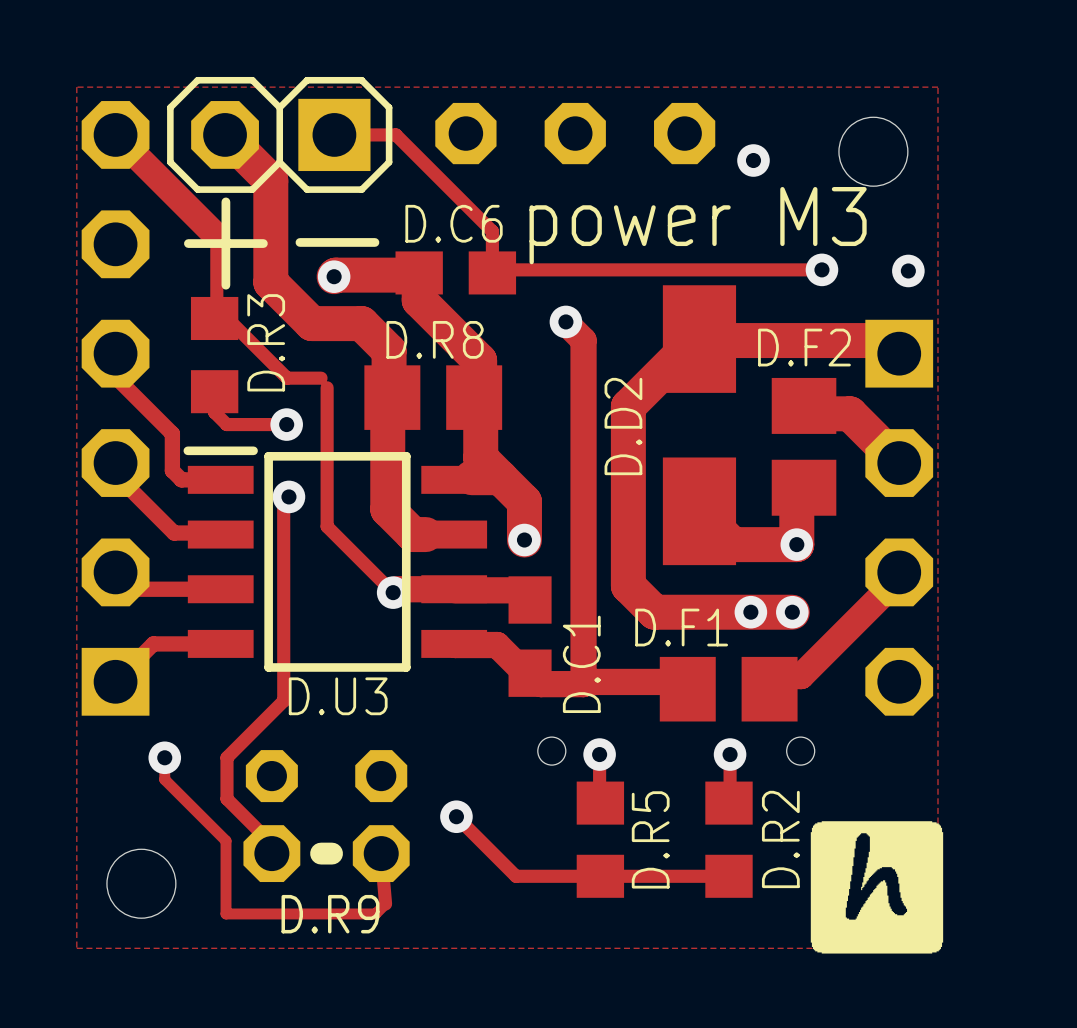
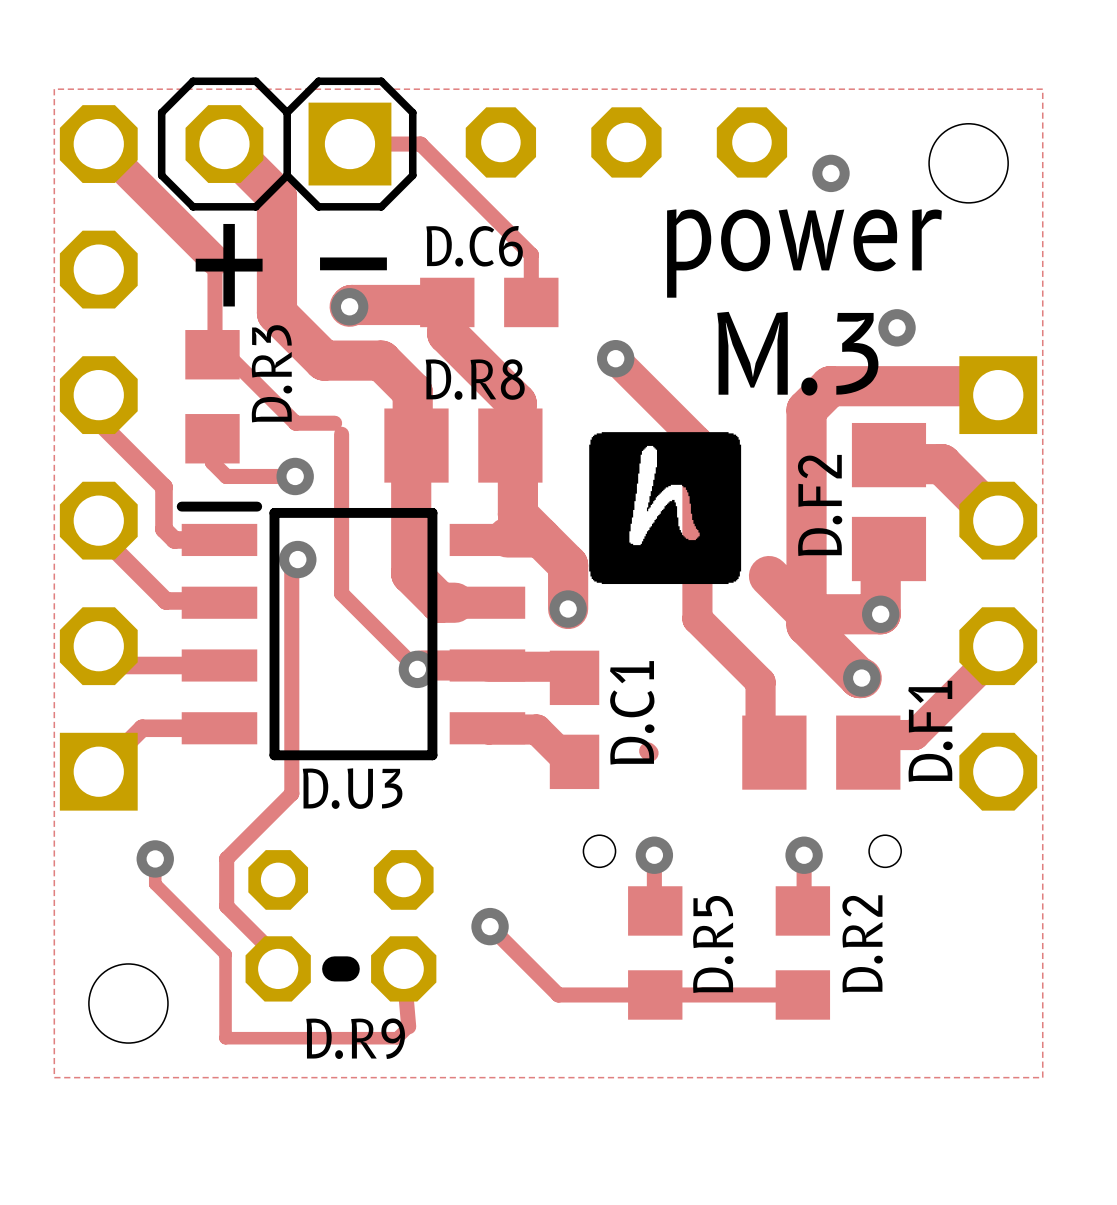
text: power M3 (698, 225) -> power (804, 253)
track: (821, 269) (495, 269) (492, 272) -> none
via position: (821, 269) -> (897, 327)
via: (908, 270) -> none
text: none -> M.3 (797, 353)
track: (699, 339) (697, 337) (628, 406) (628, 585) (654, 612) (792, 612) -> none
track: (583, 340) (583, 684) (540, 684) (528, 671) -> (635, 379) (697, 441) (697, 619) (760, 682) (760, 738) (774, 752)
track: (694, 340) (886, 340) (891, 345) -> (861, 678) (859, 678) (806, 625) (806, 410) (830, 386) (989, 386)
D.F2 name rotation: 0° (804, 347) -> 90° counterclockwise (820, 505)
drawing: none -> [589, 432, 742, 585]
D.D2: (699, 425) -> none
track: (899, 576) (801, 676) (782, 676) (769, 689) -> (998, 651) (914, 735) (885, 735) (868, 752)
via: none -> (861, 678)
via: (750, 612) -> none
via: (792, 612) -> none
D.F1 name rotation: 0° (681, 627) -> 90° counterclockwise (930, 731)
D.F1 name position: D.F1 (681, 627) -> D.F1 (930, 731)
track: none -> (647, 751) (649, 753)
D.C1 name position: D.C1 (581, 664) -> D.C1 (632, 712)
track: (583, 681) (680, 681) (687, 689) -> none
D.F1 position: (728, 689) -> (821, 752)
drawing: [810, 821, 944, 954] -> none

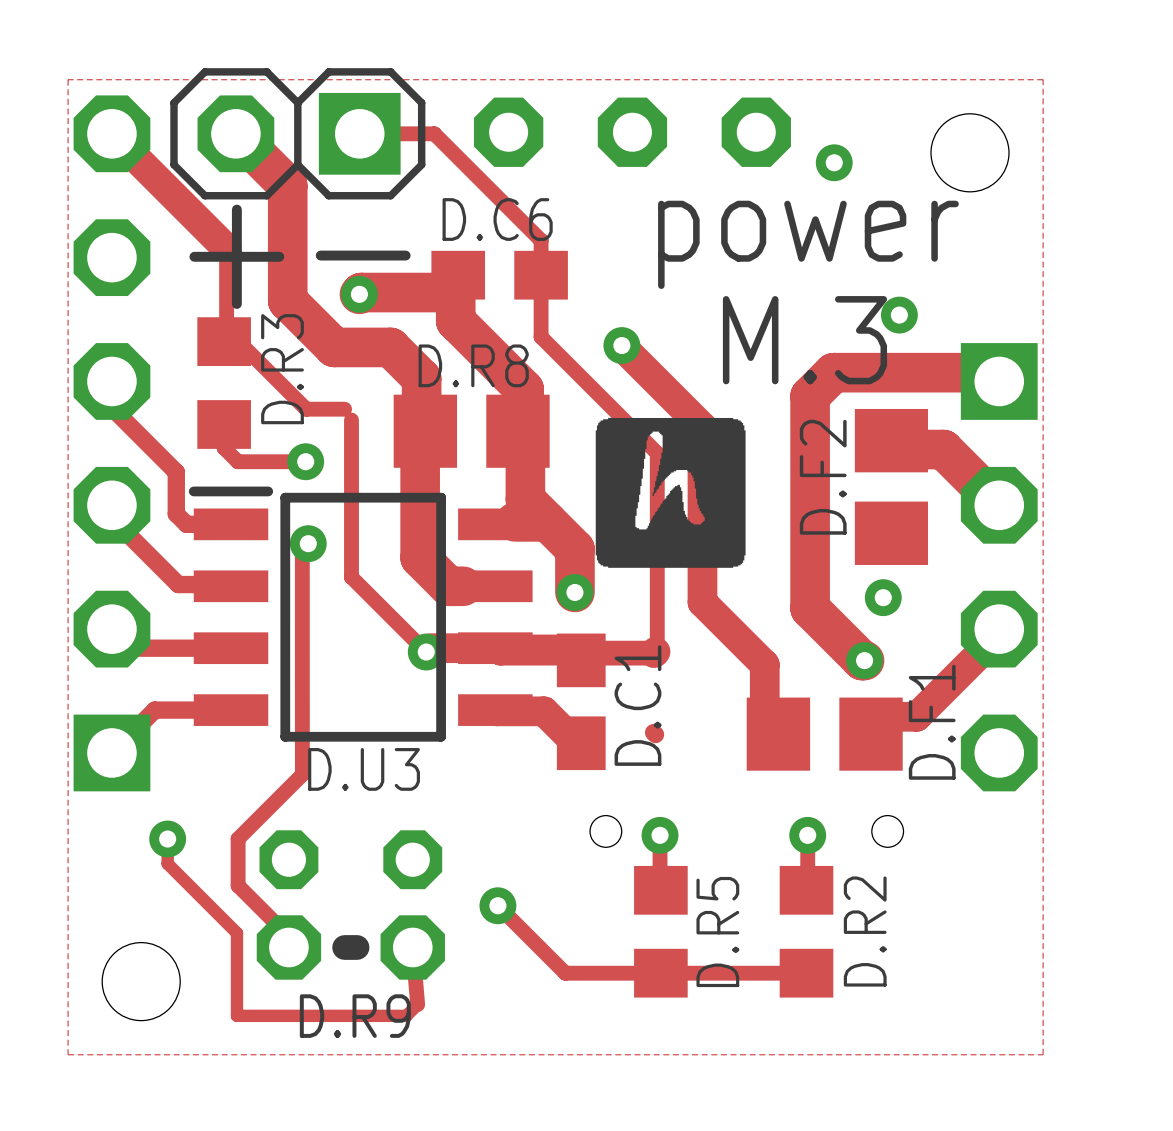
track: (420, 144) (531, 254) (531, 302) -> (429, 133) (434, 133) (541, 240) (541, 337) (657, 453) (657, 651) (655, 654) (653, 654) (655, 651) (500, 653) (496, 649)
D.C6 position: (489, 302) -> (499, 275)
track: (888, 549) (880, 557) (880, 614) (807, 614) (768, 576) -> none

